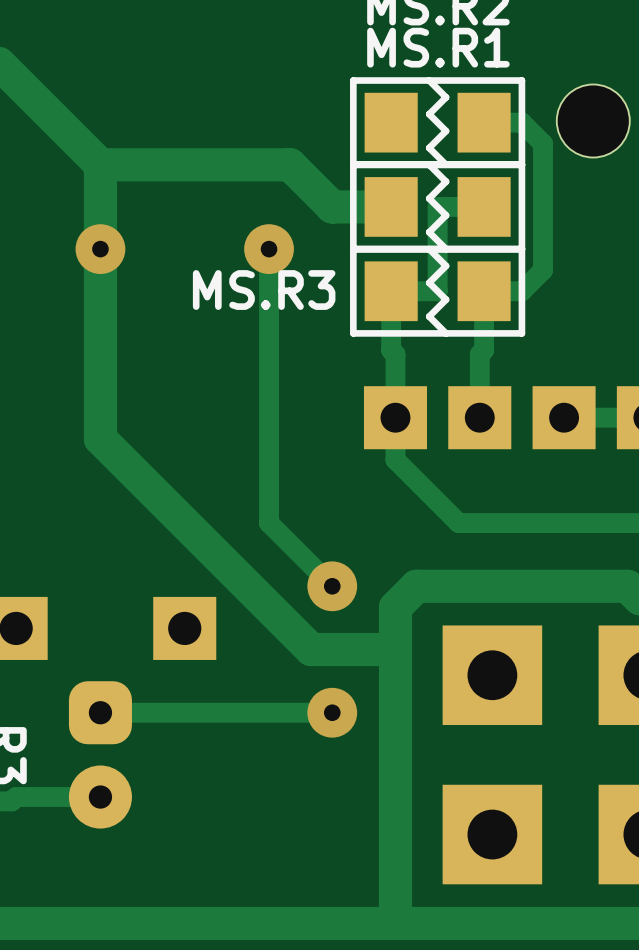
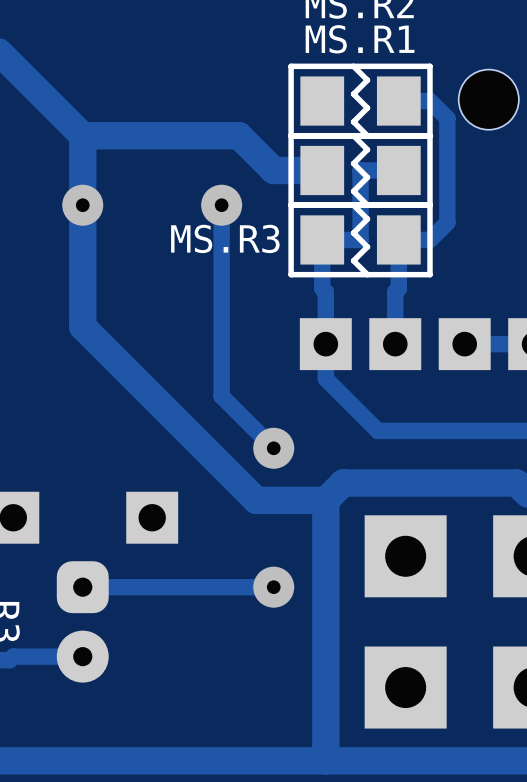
track: (100, 396) (100, 438) (311, 649) (395, 649) -> (82, 326) (256, 500) (325, 500)
track: (269, 480) (269, 523) (332, 586) -> (221, 396) (273, 448)
via position: (332, 586) -> (273, 448)

